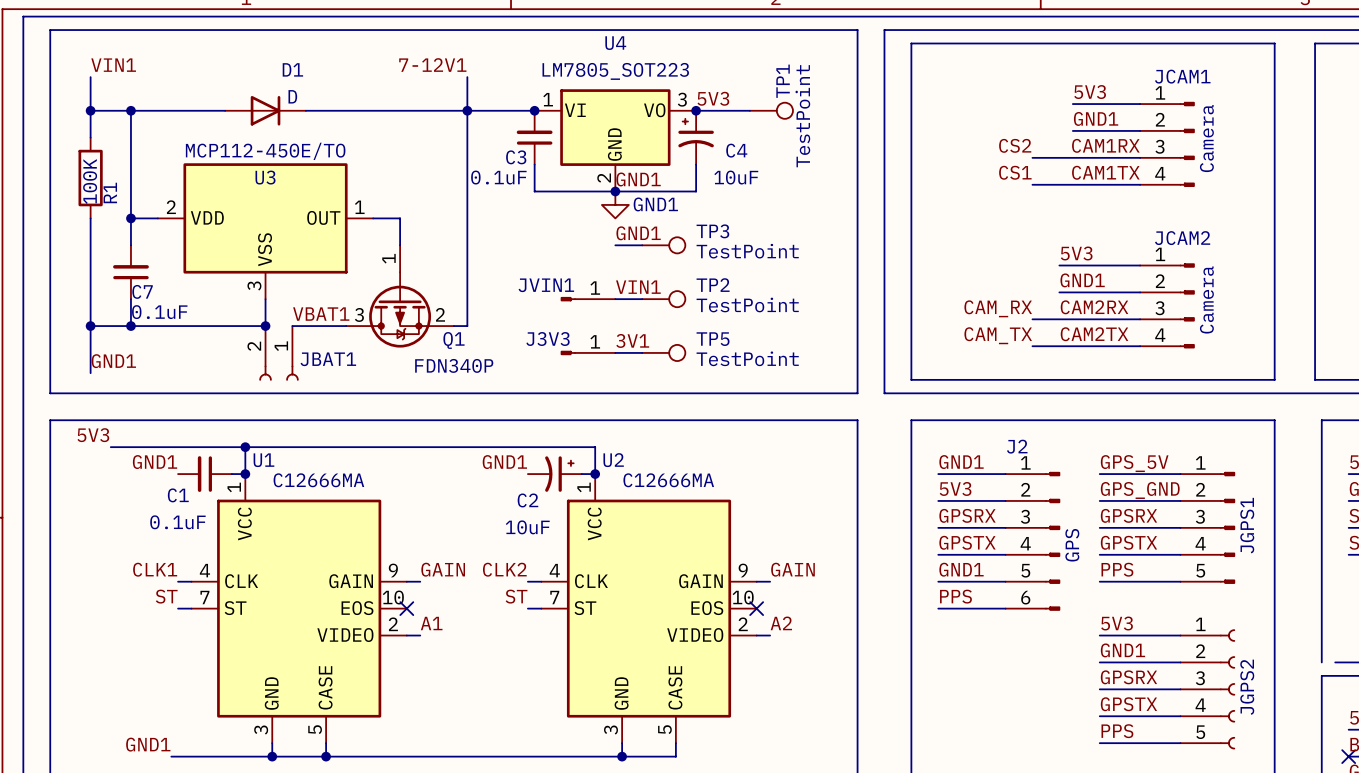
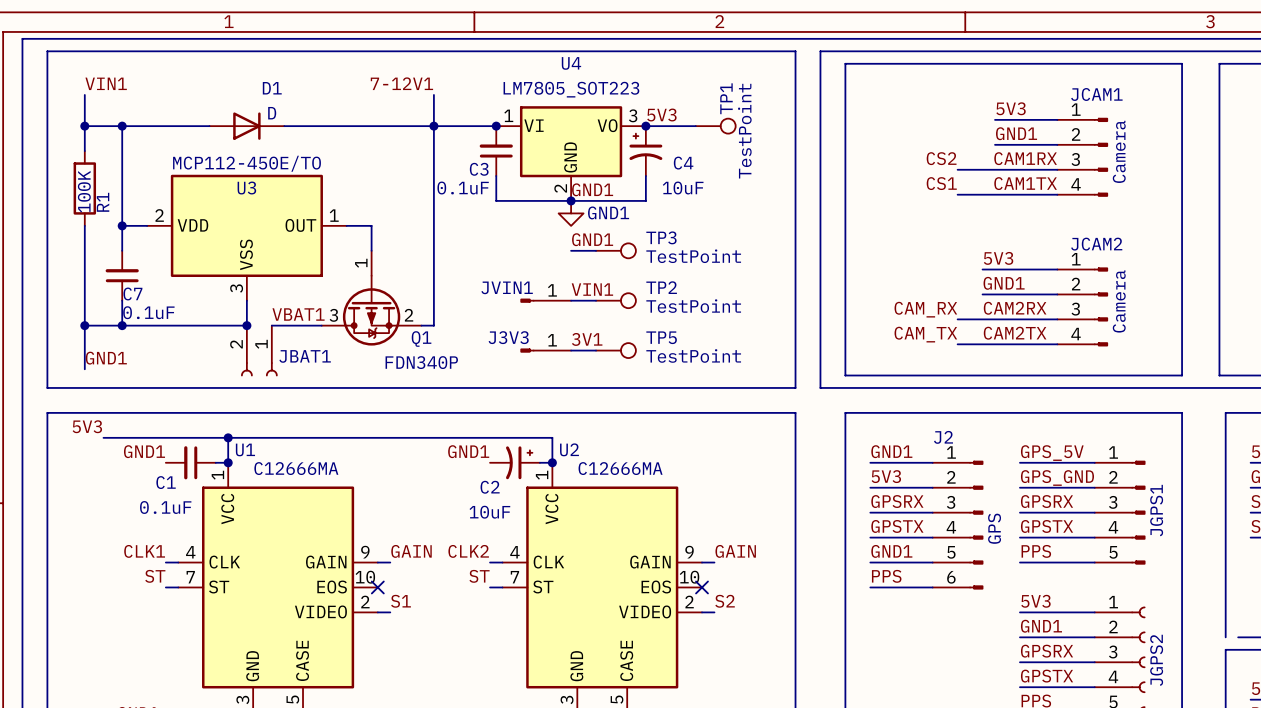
label: A1 (431, 623) -> S1 (400, 601)
label: A2 (781, 623) -> S2 (725, 601)

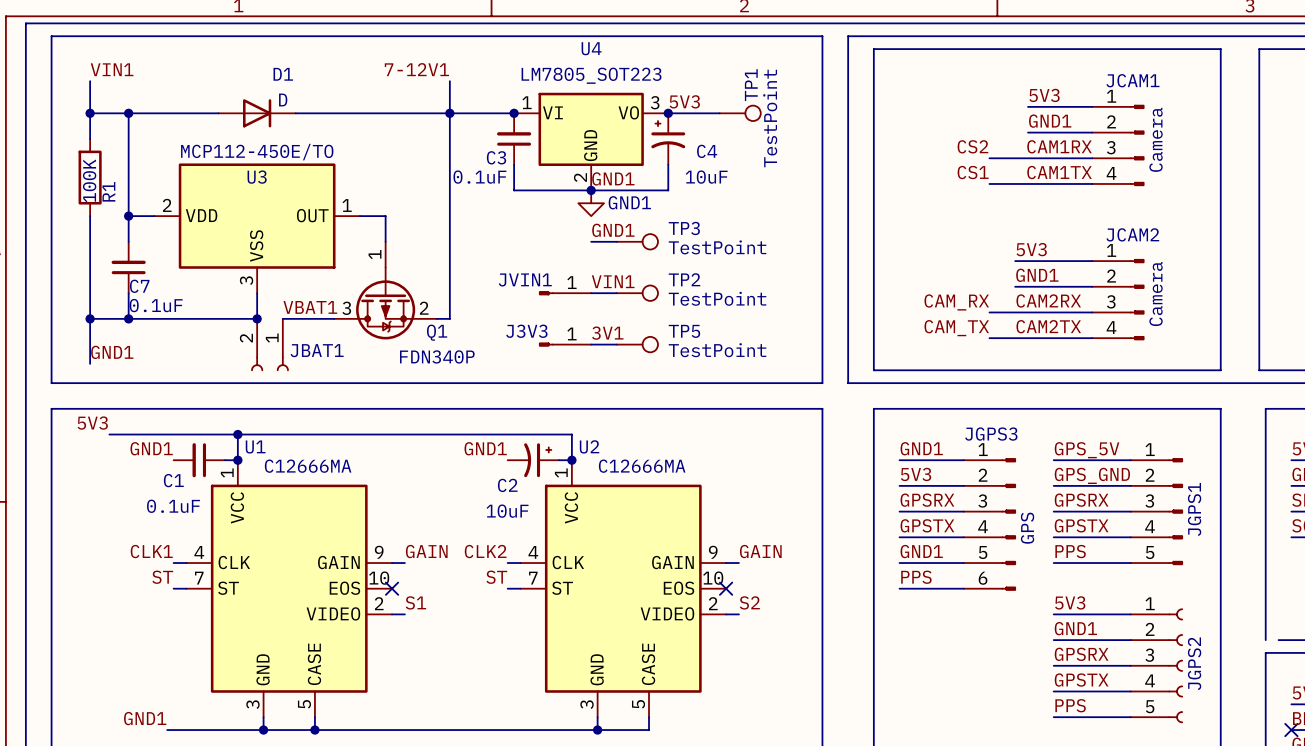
J2 name: J2 (943, 437) -> JGPS3 (991, 434)

